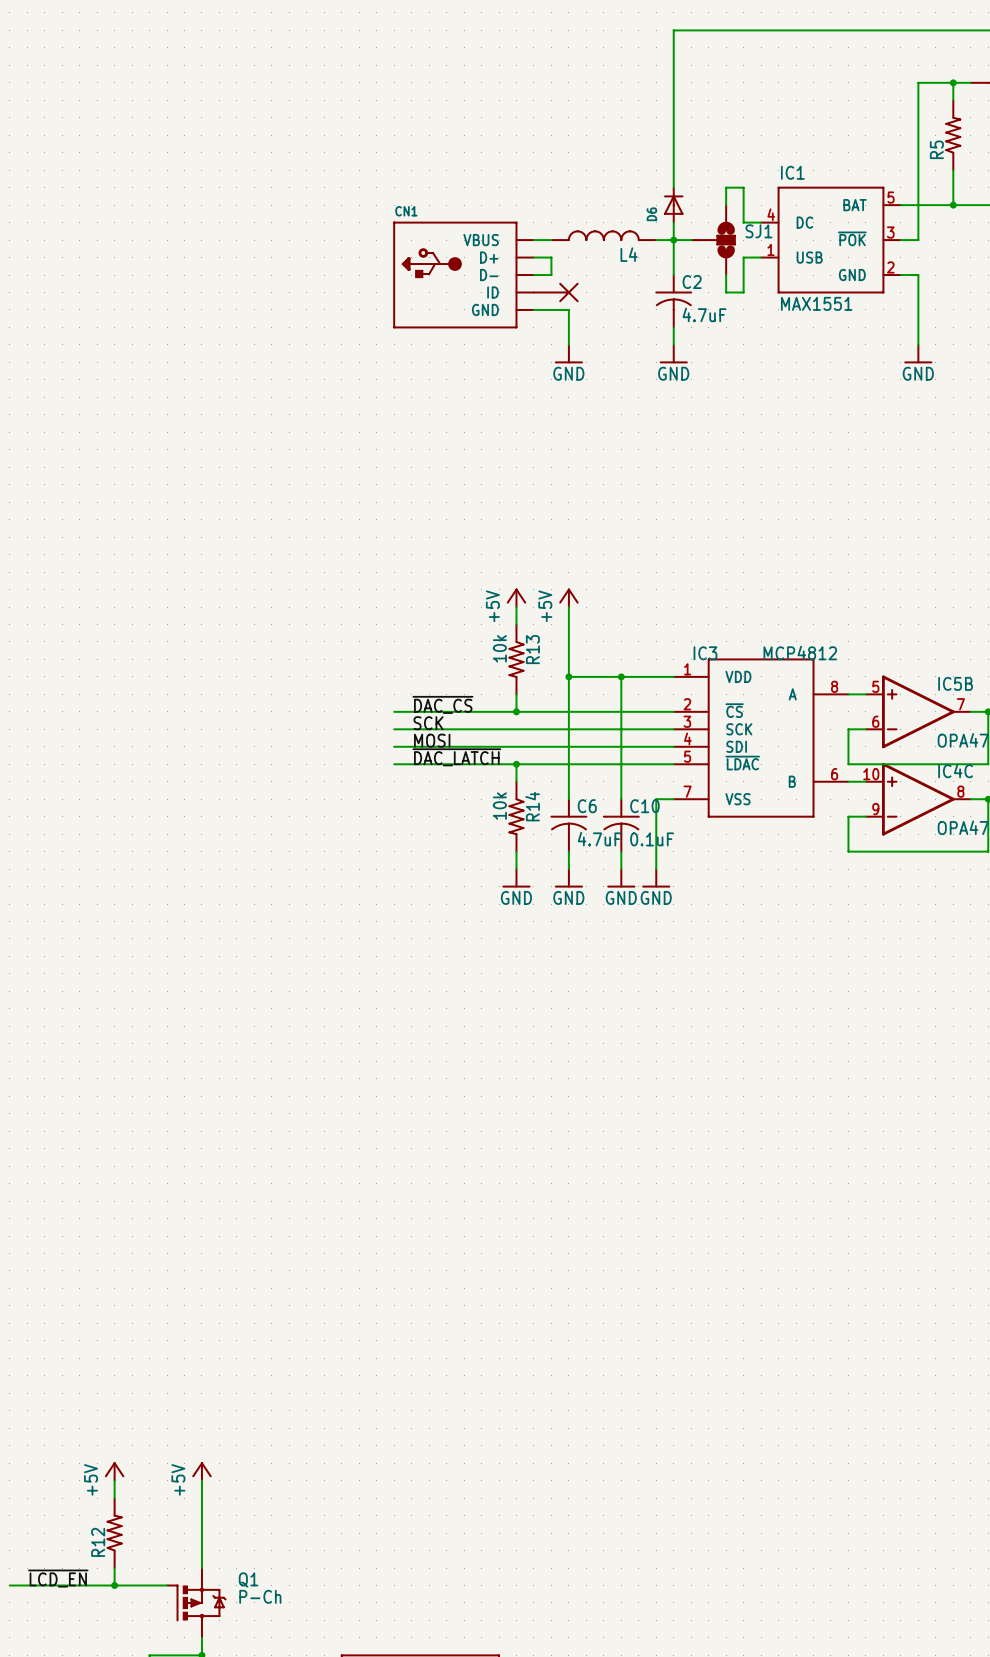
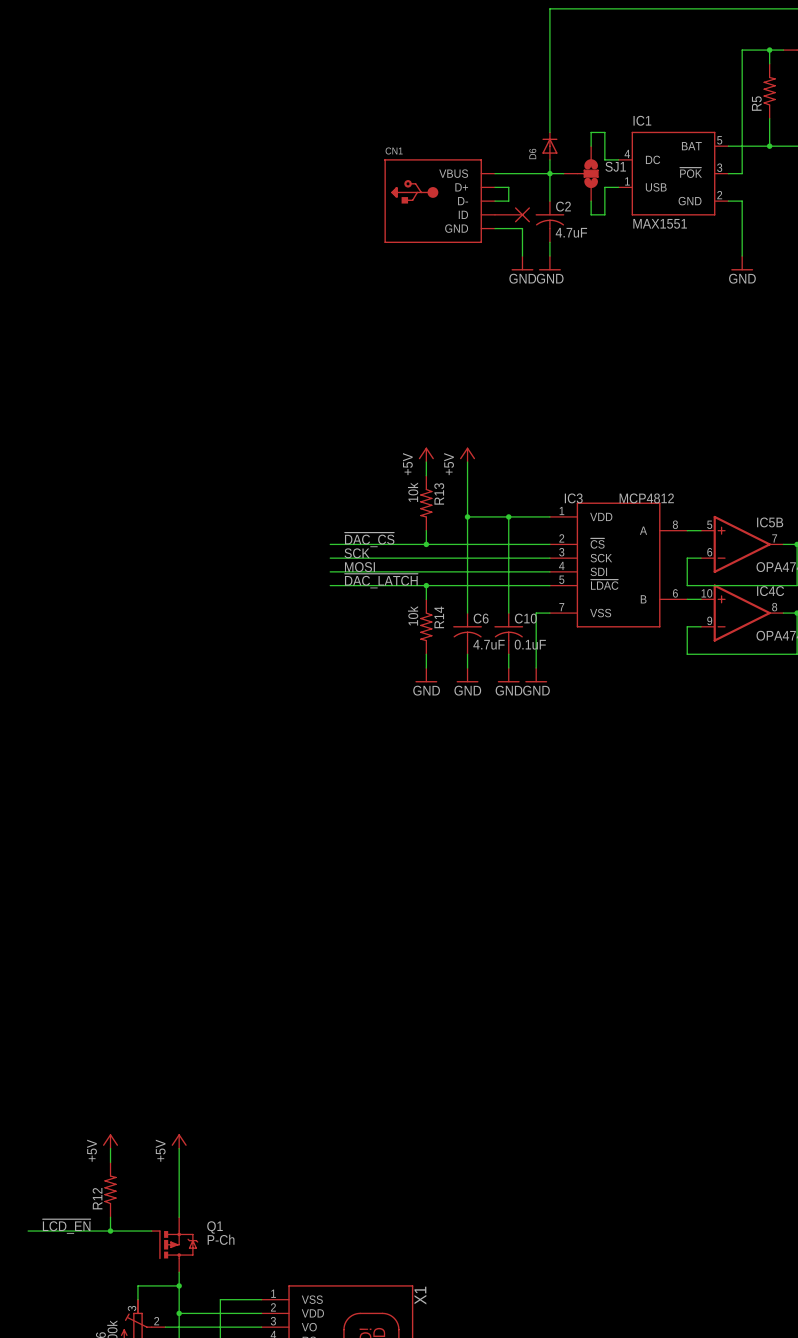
L4: (603, 235) -> none
wire: none -> (495, 173) (536, 173)
wire: (533, 257) (551, 257) (551, 275) (533, 275) -> (495, 187) (508, 187) (508, 201) (495, 201)
CN1 position: (463, 275) -> (439, 201)
part position: (555, 292) -> (512, 214)
wire: (533, 309) (568, 309) (568, 344) -> (495, 228) (522, 228) (522, 256)
power symbol position: GND (568, 354) -> GND (522, 263)

